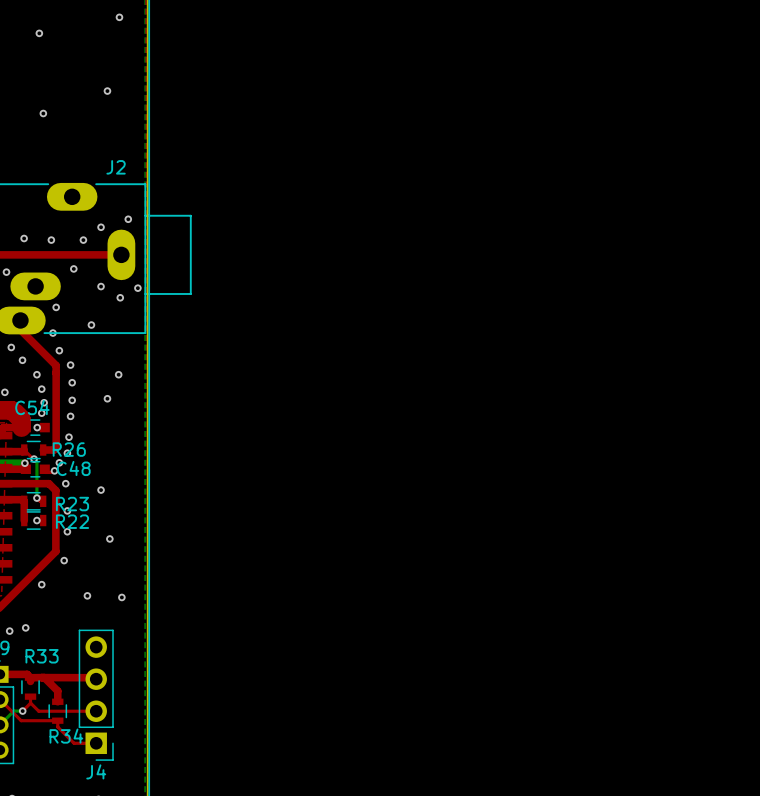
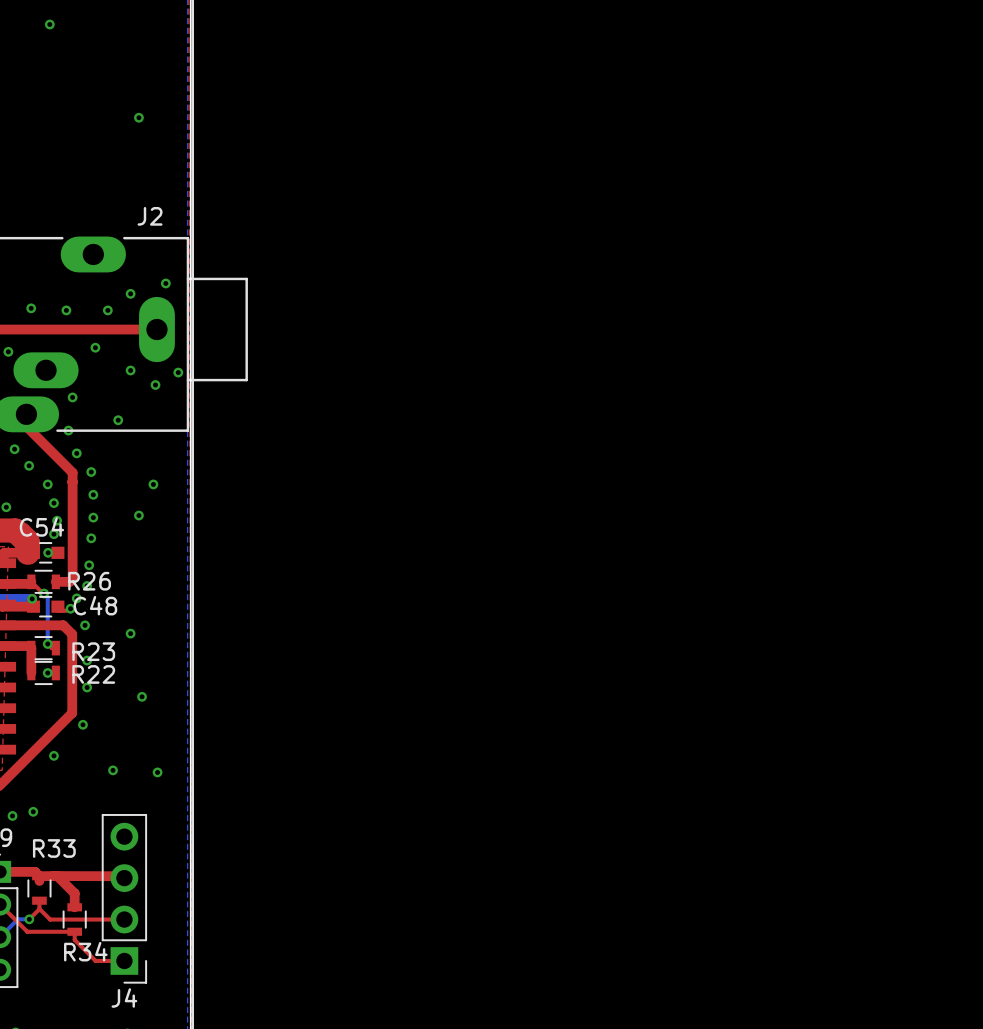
via: (119, 17) -> none
via: none -> (49, 24)
via: (39, 33) -> none
via: (43, 113) -> none

